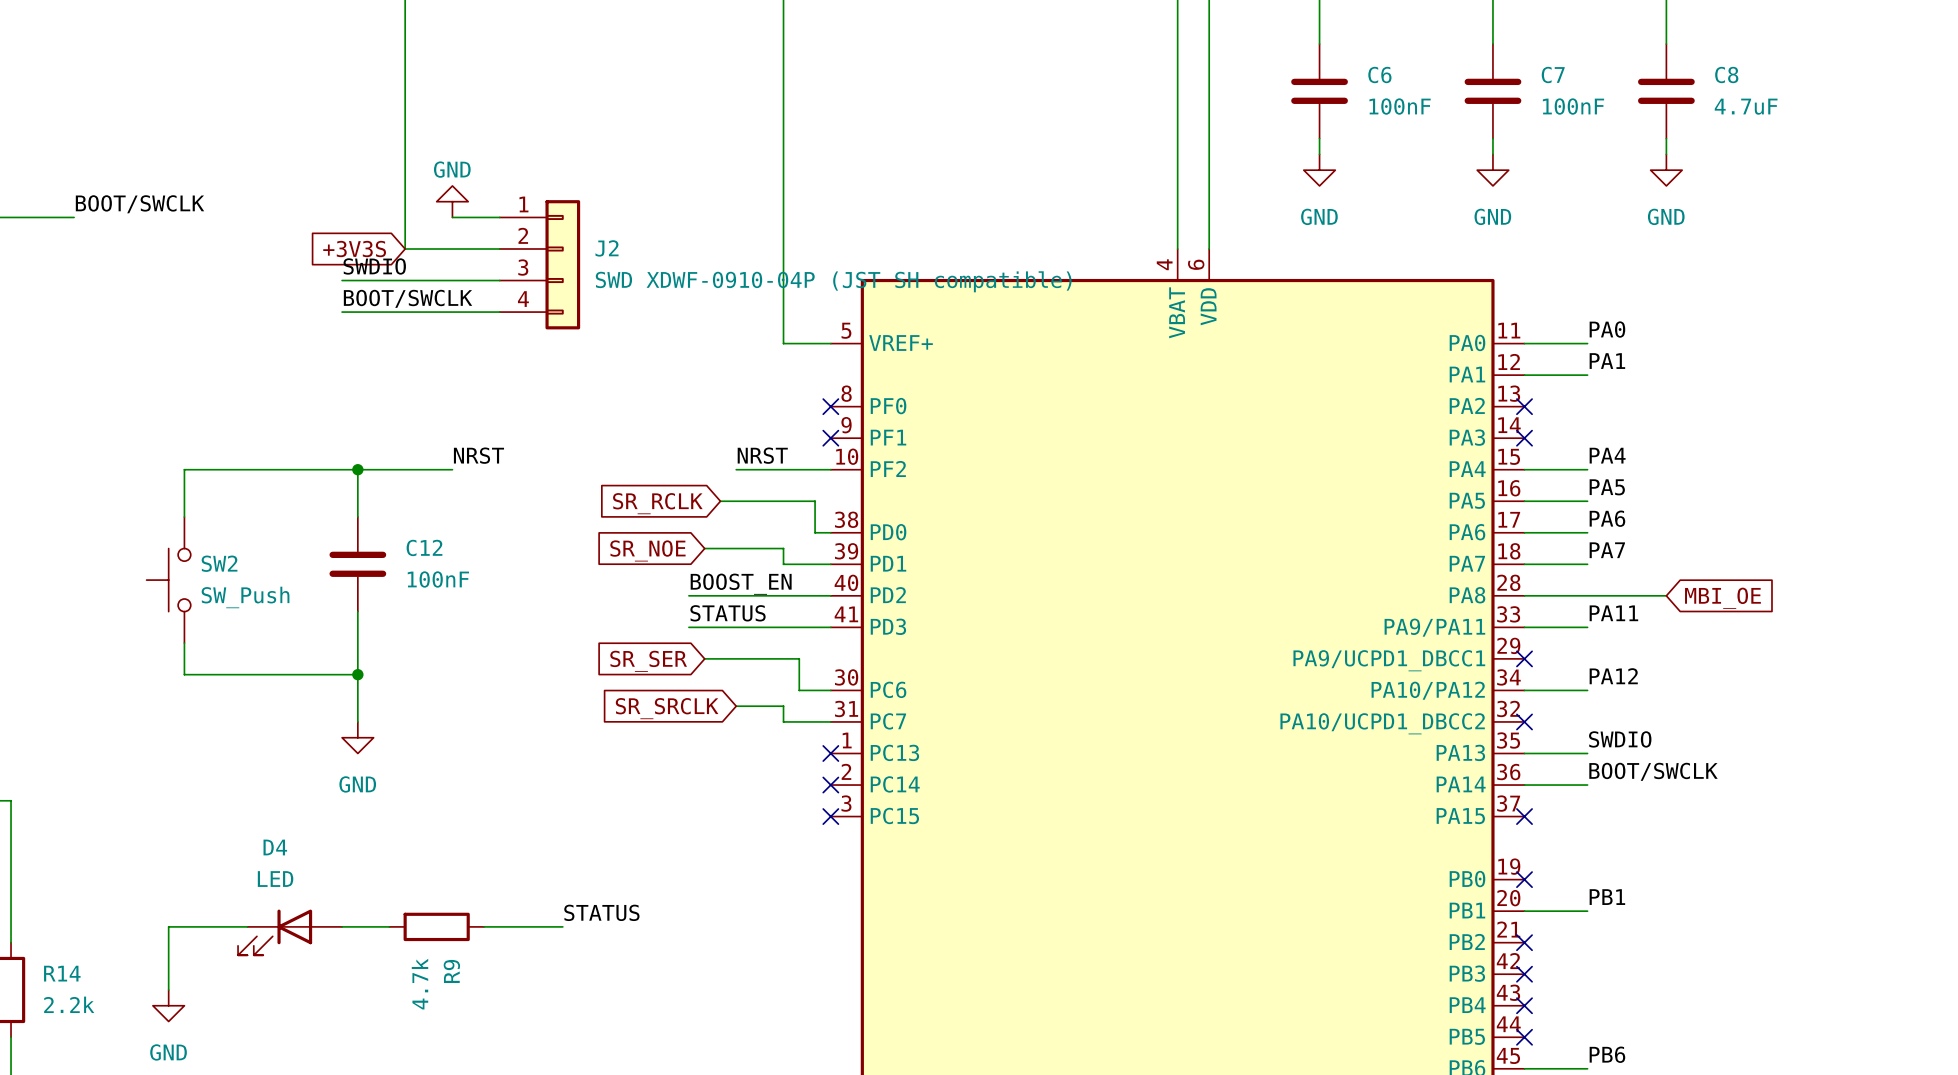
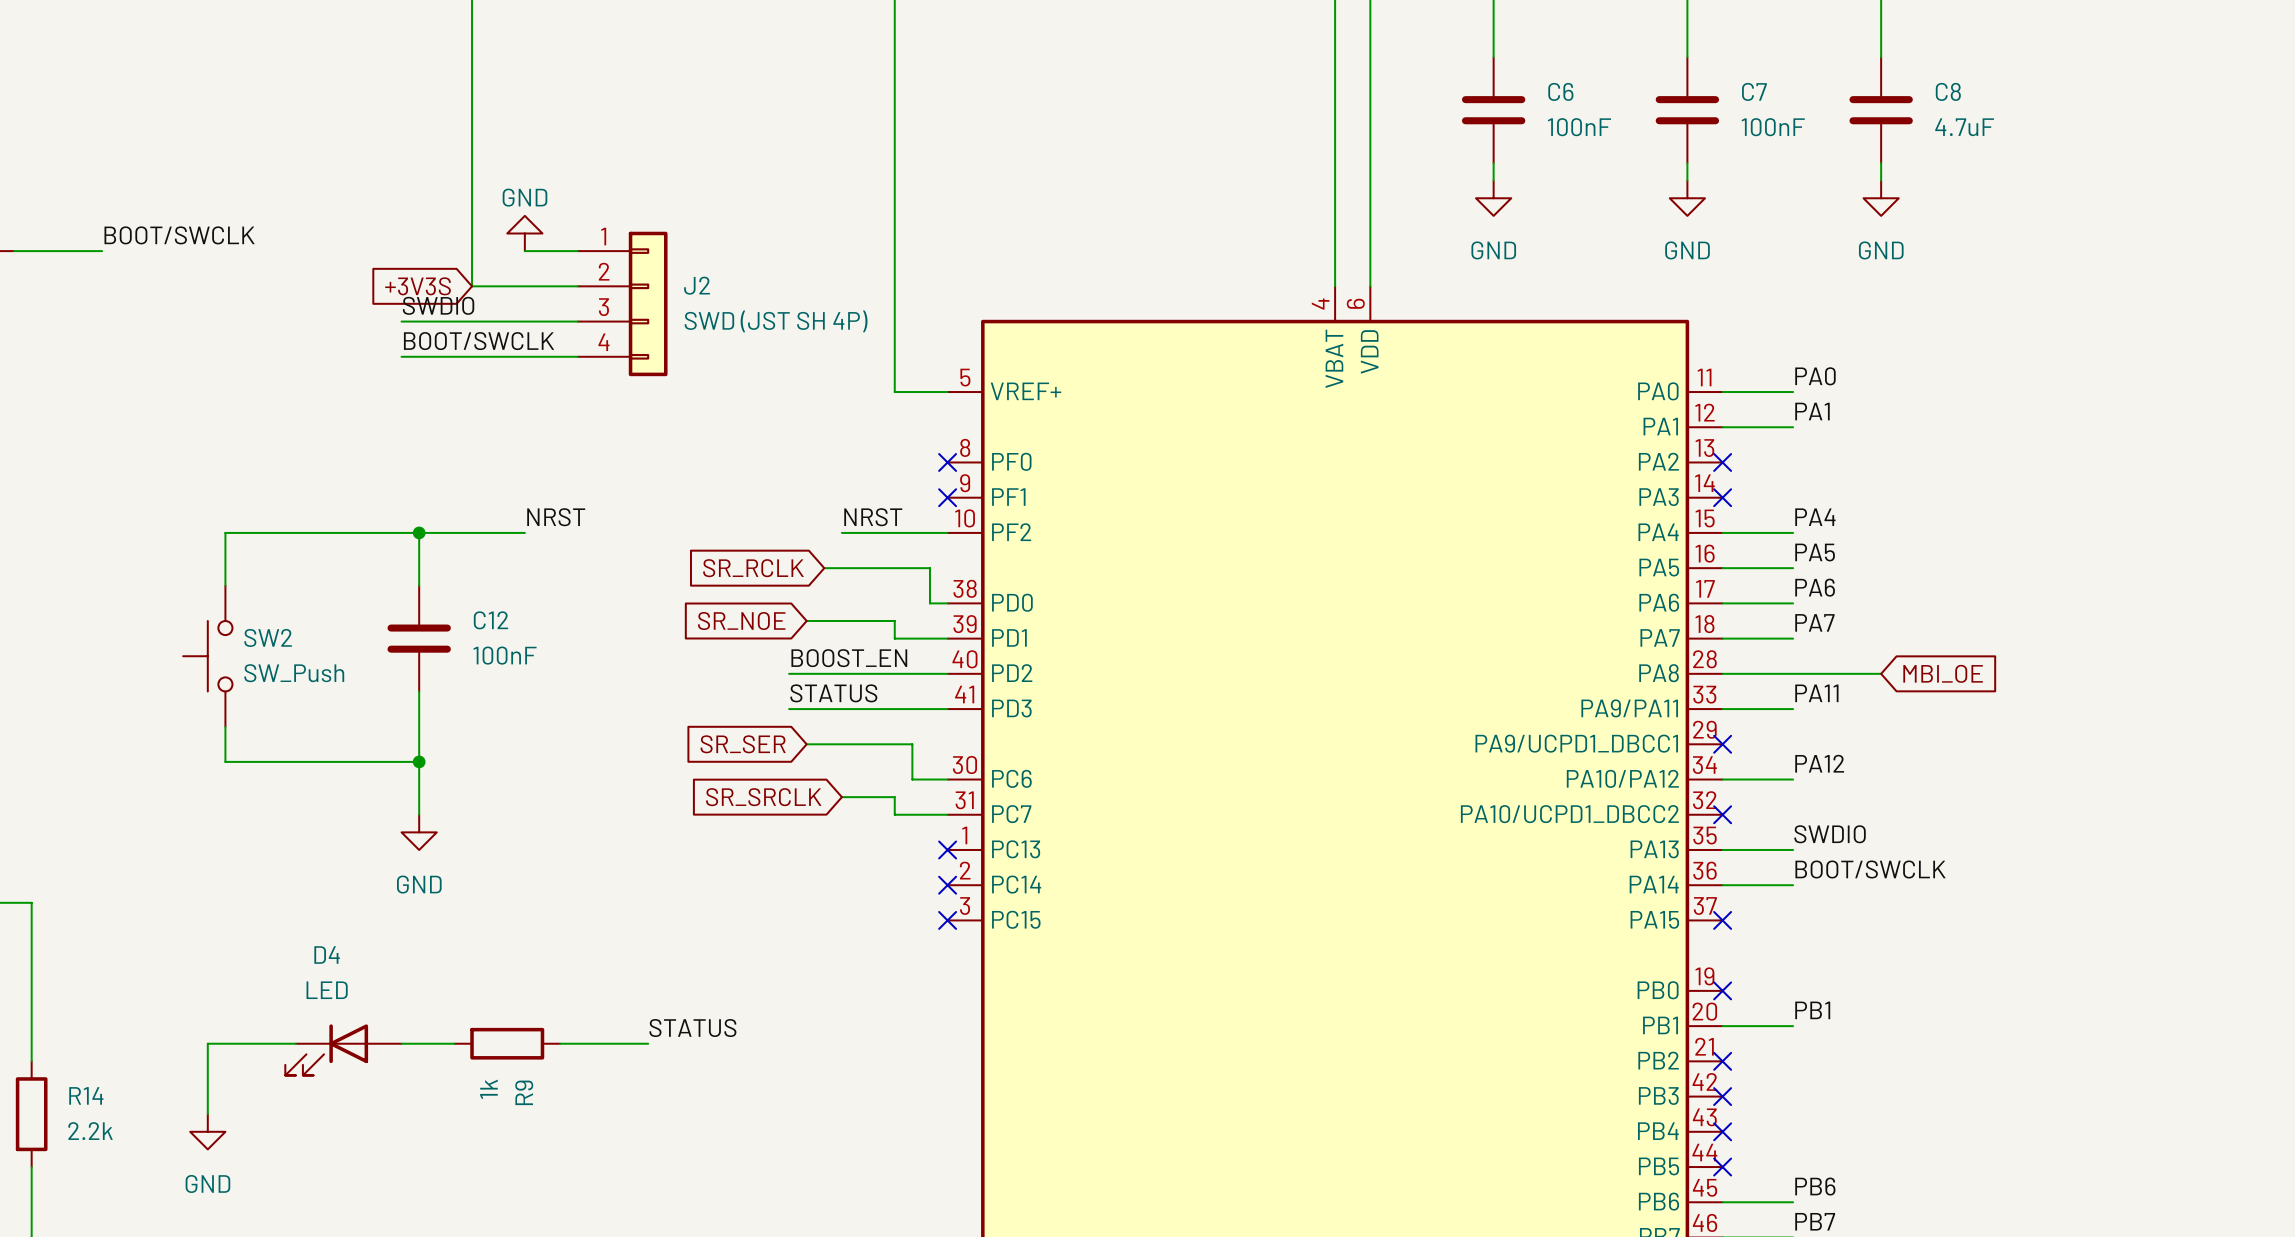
J2 value: SWD XDWF-0910-04P (JST SH compatible) (833, 281) -> SWD (JST SH 4P) (776, 321)
R9 value: 4.7k (419, 984) -> 1k (488, 1089)

